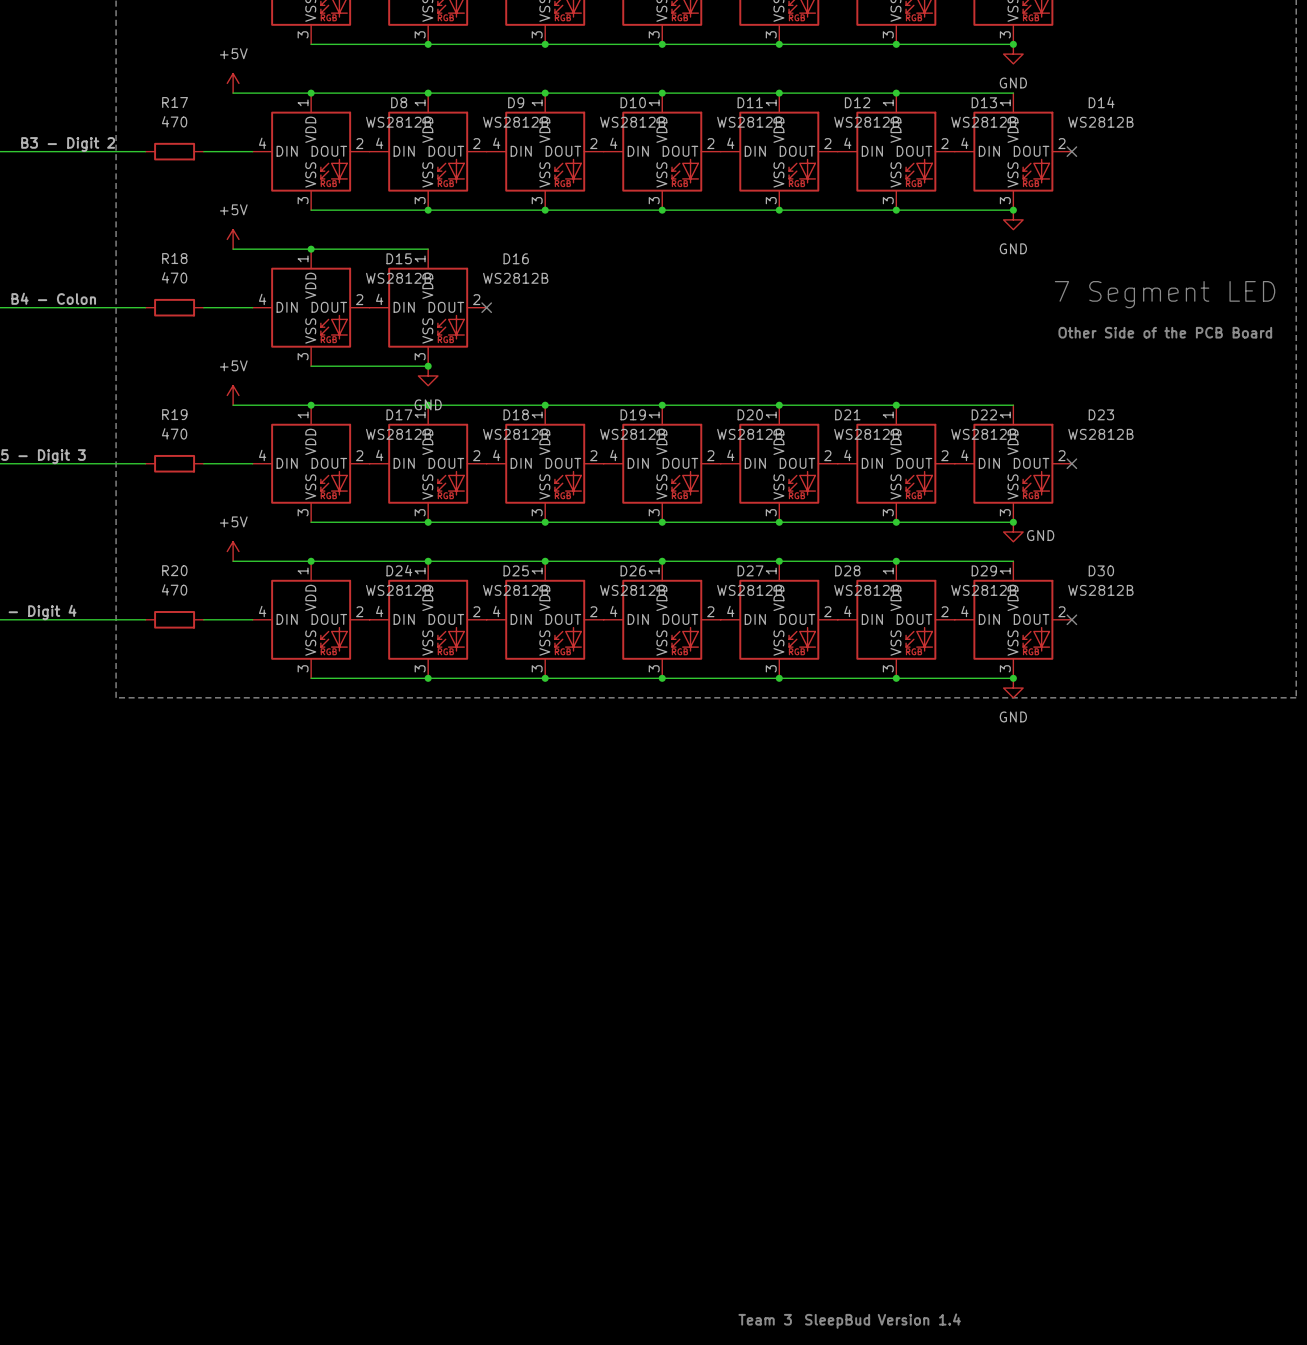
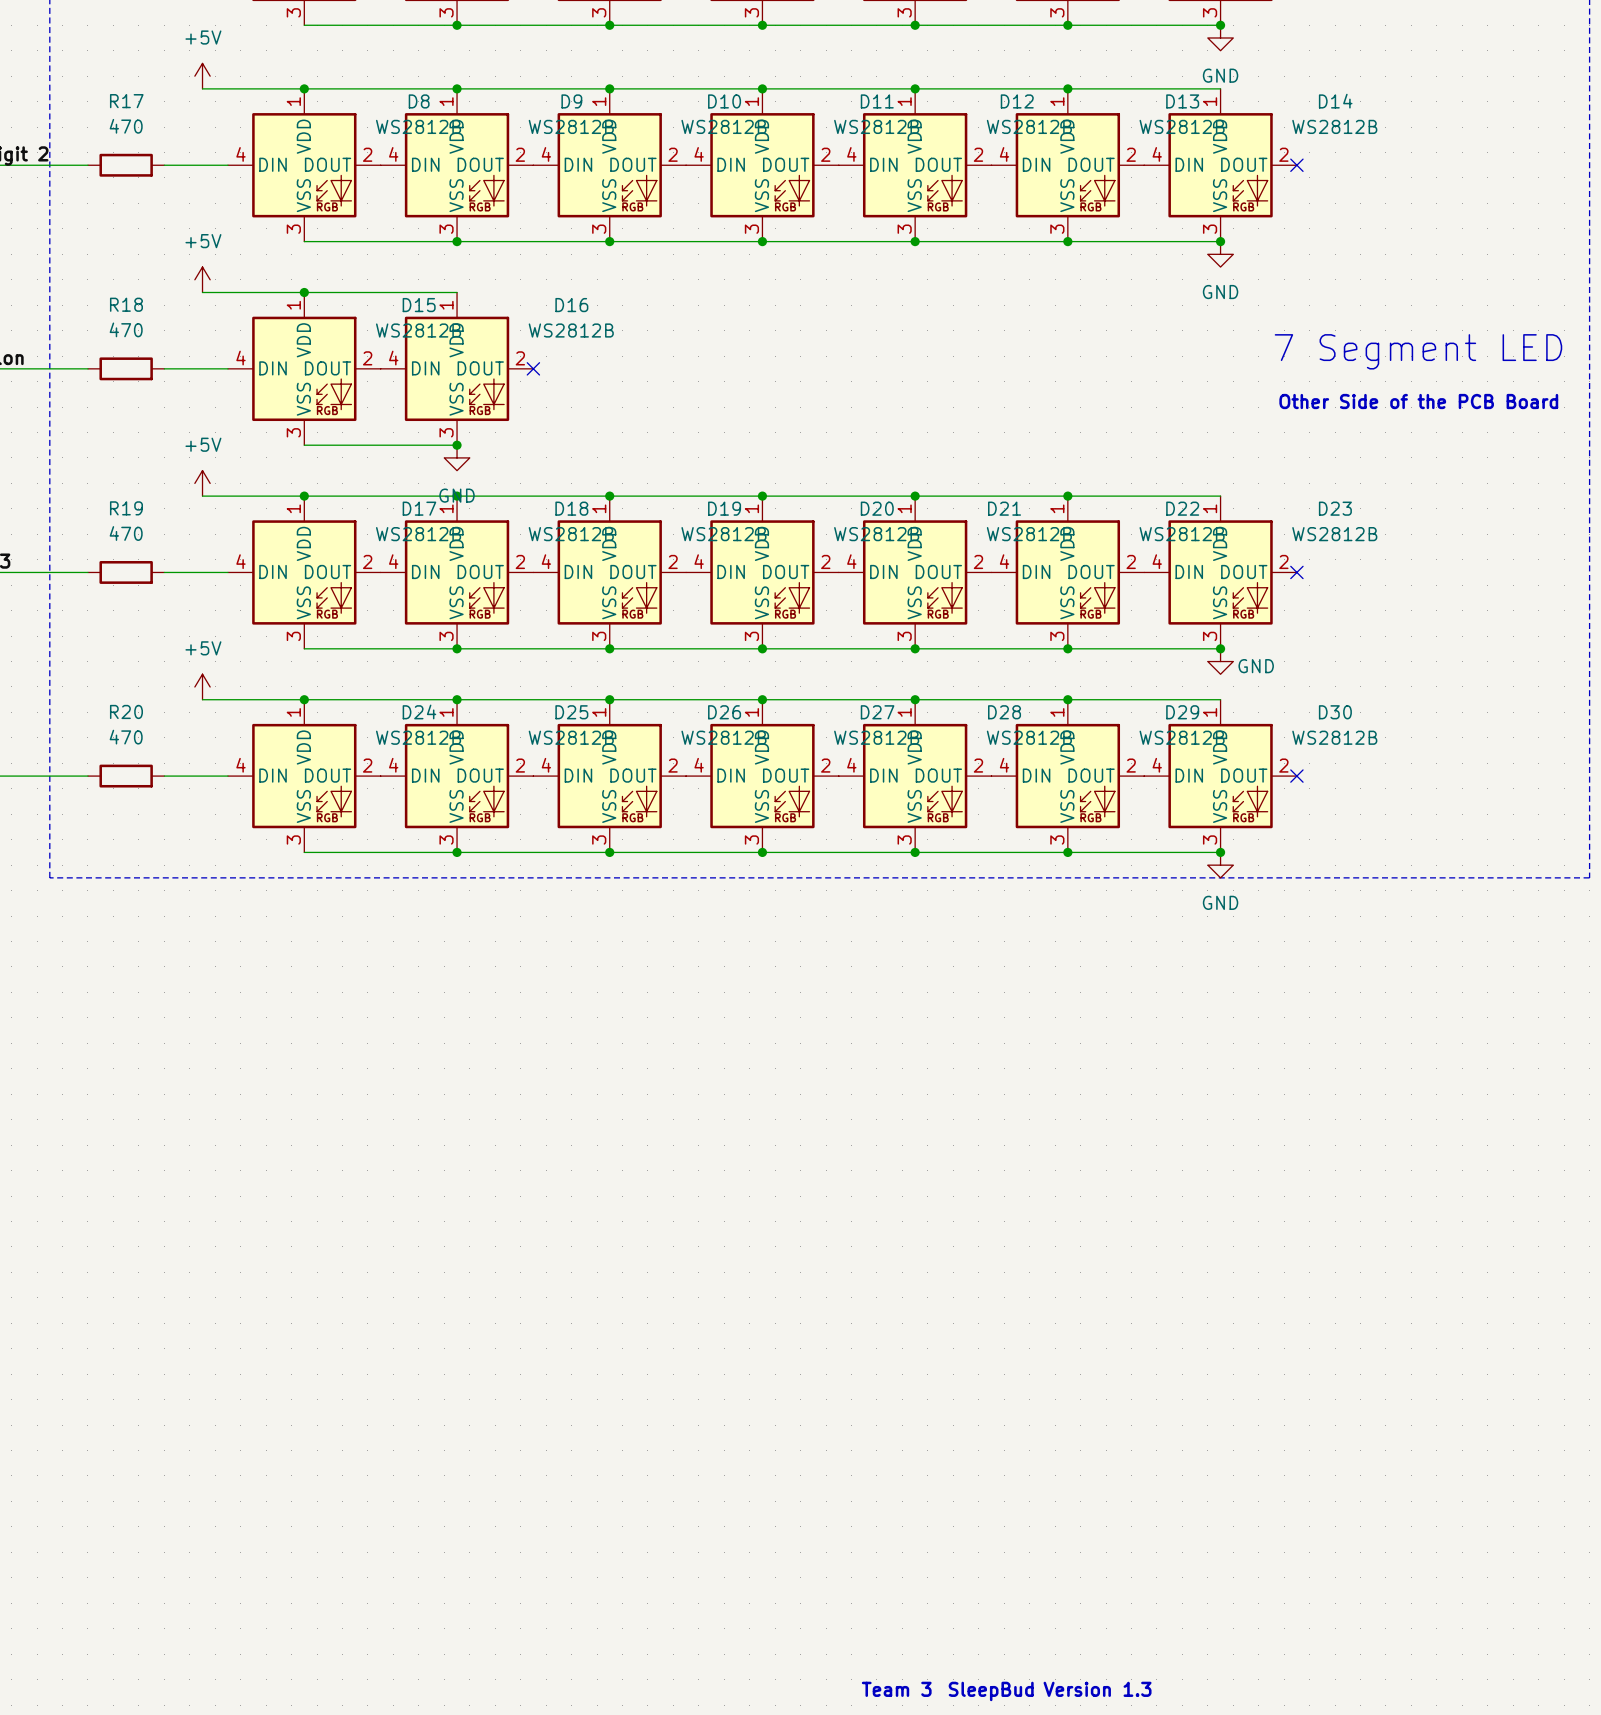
text: Version 1.4 (919, 1319) -> Version 1.3 (1097, 1689)

